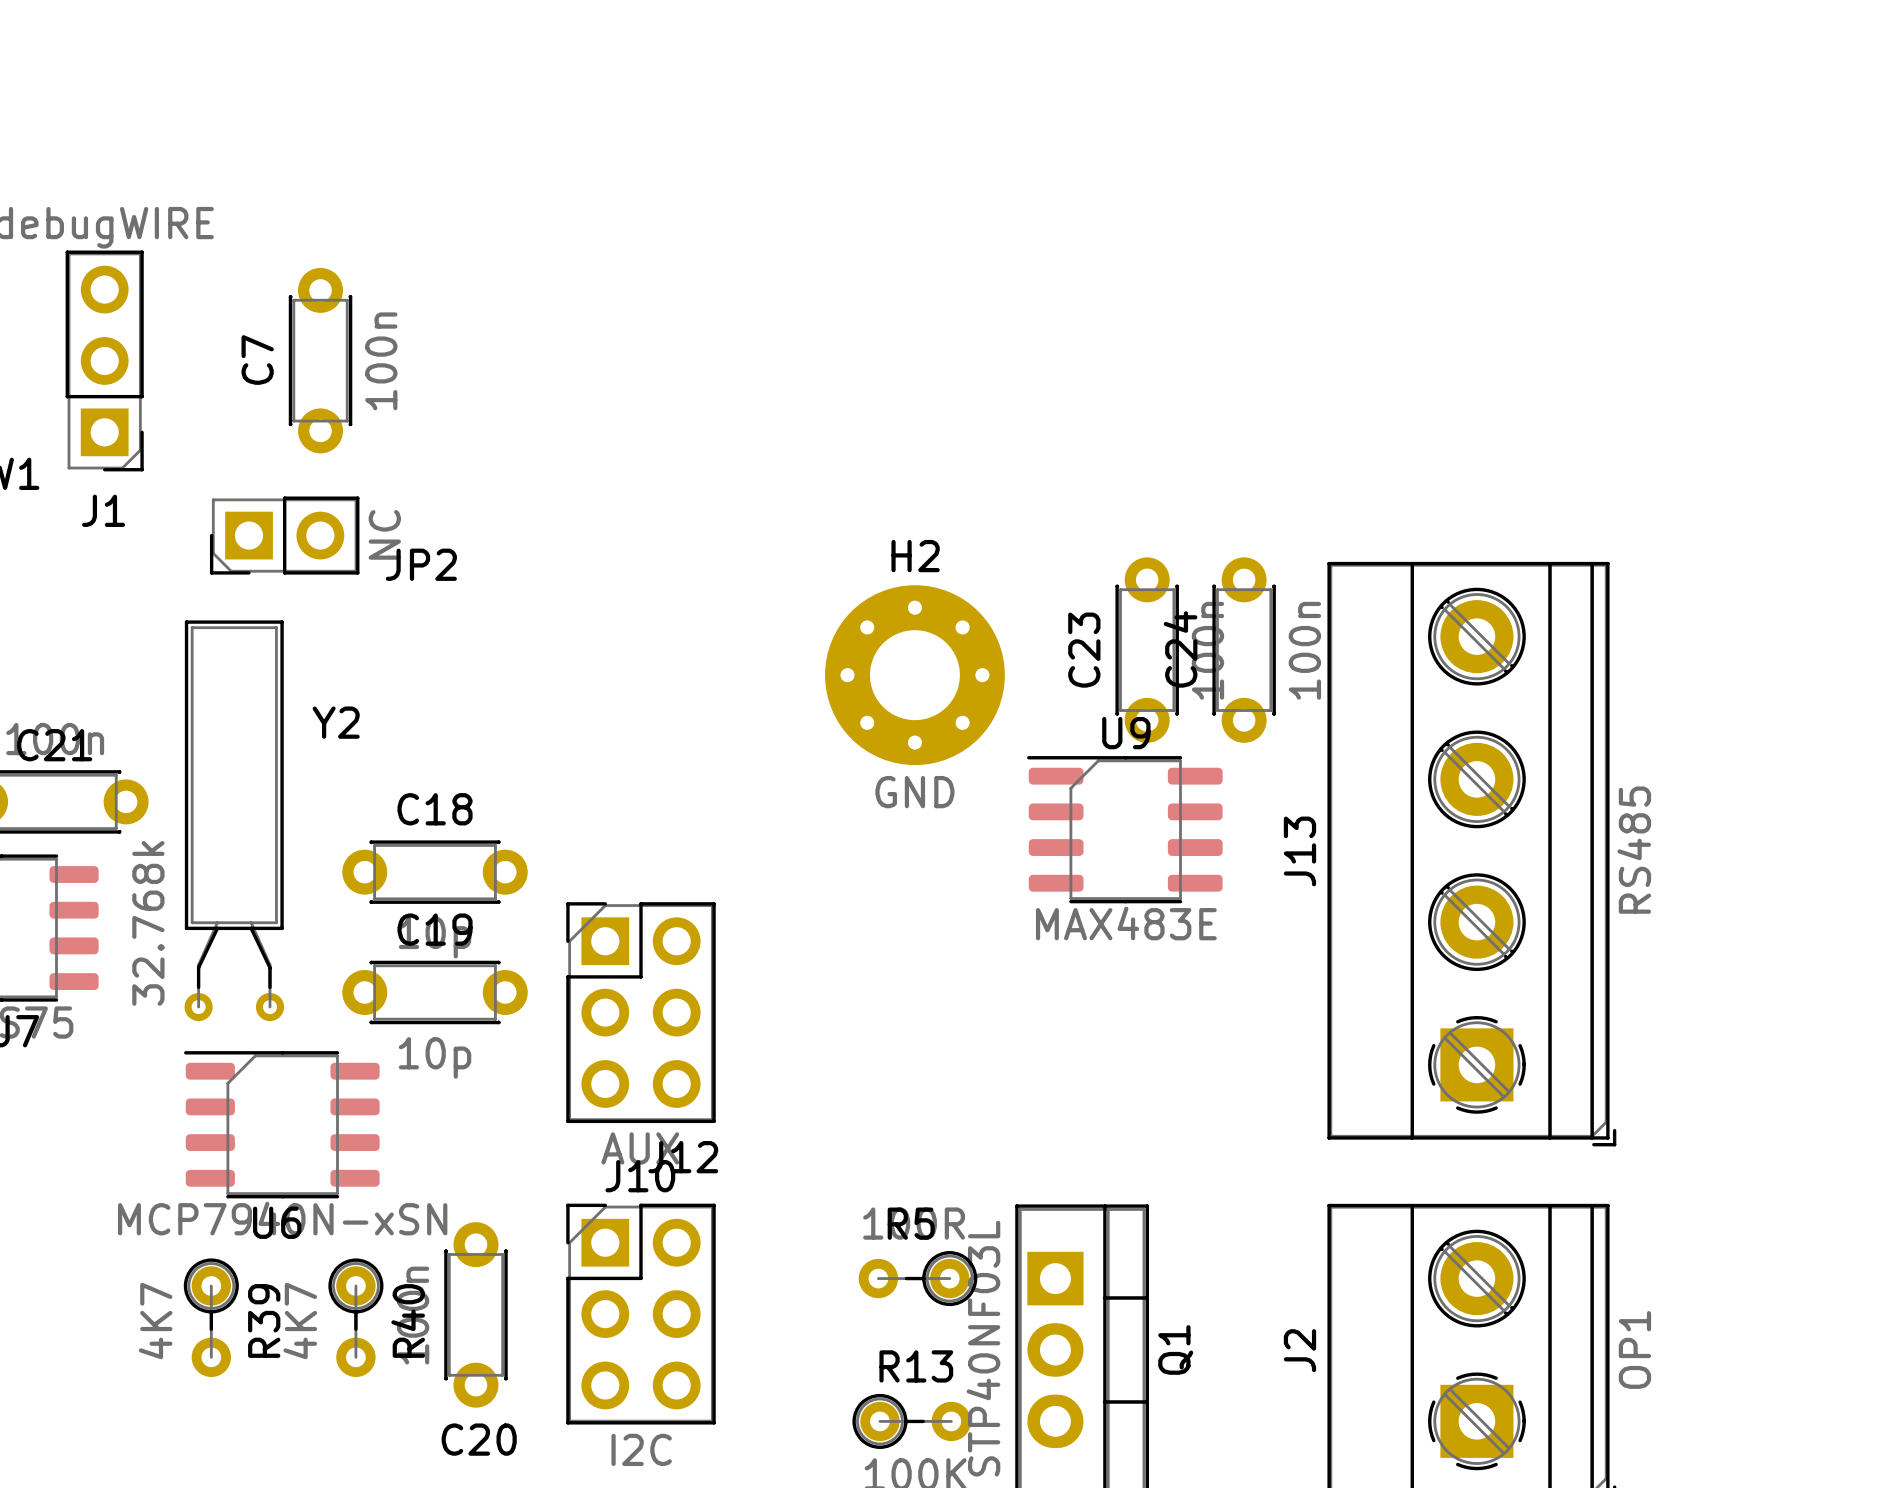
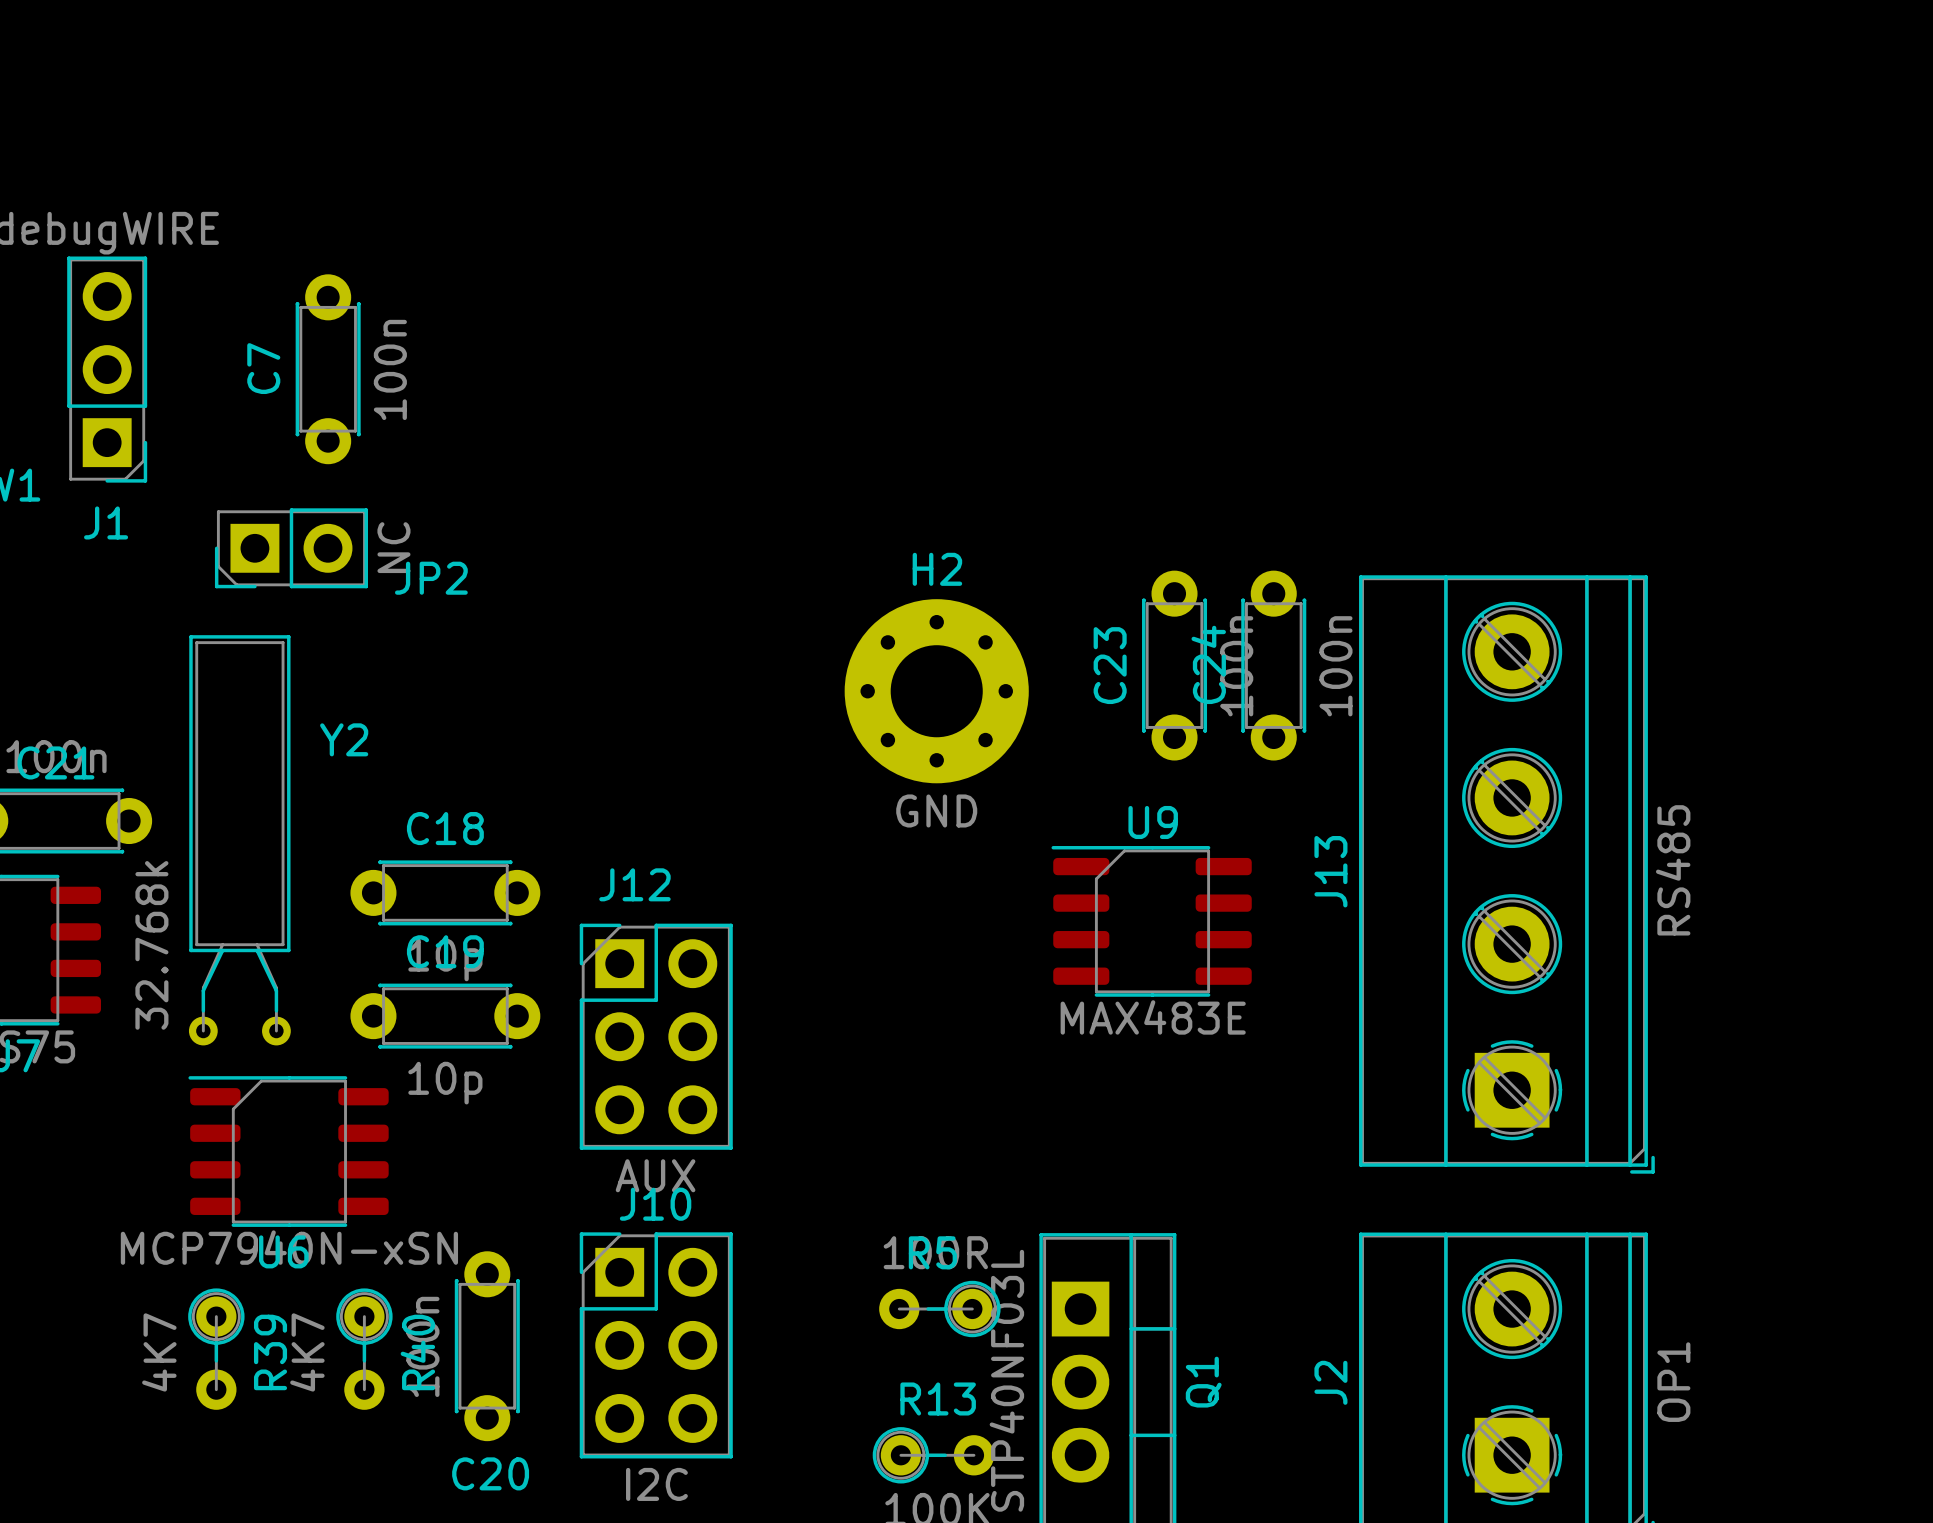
U9 position: (1124, 829) -> (1151, 921)
J12 name position: J12 (683, 1157) -> J12 (634, 884)

